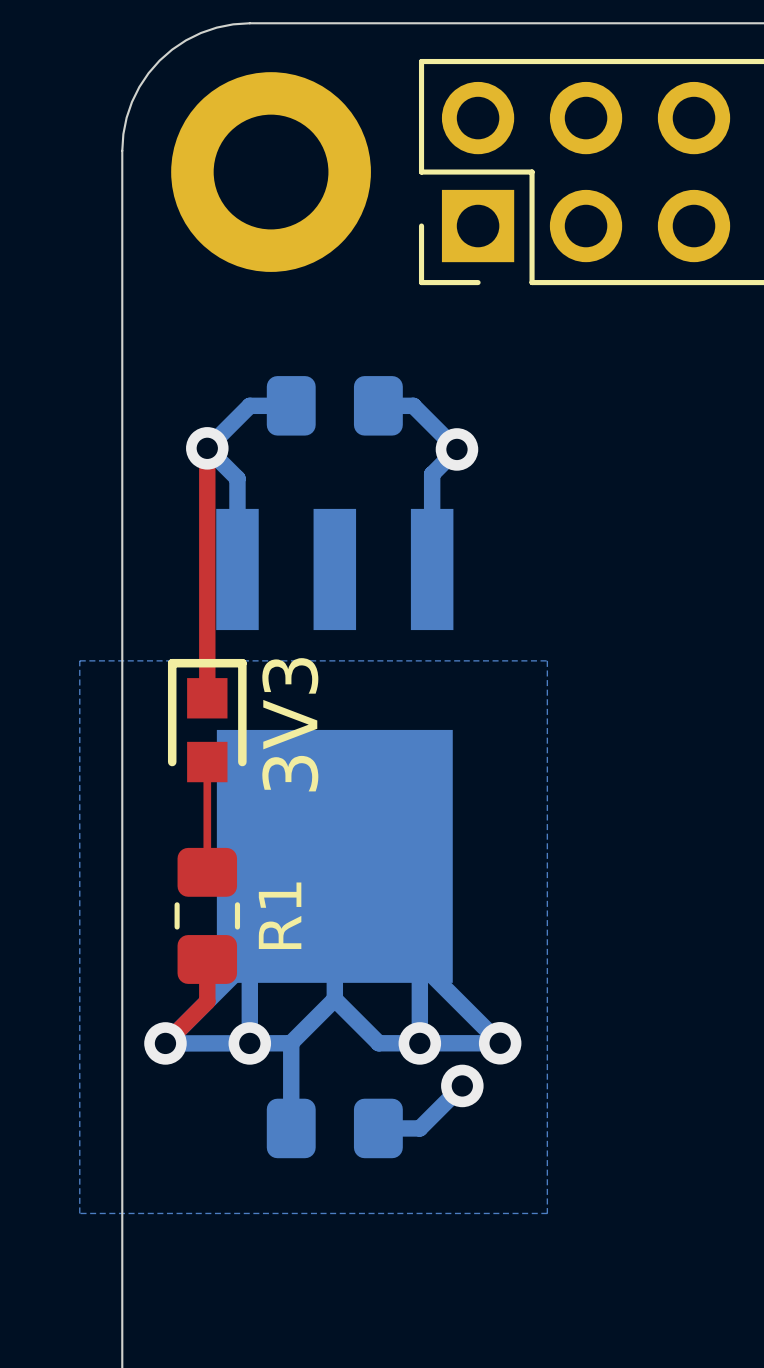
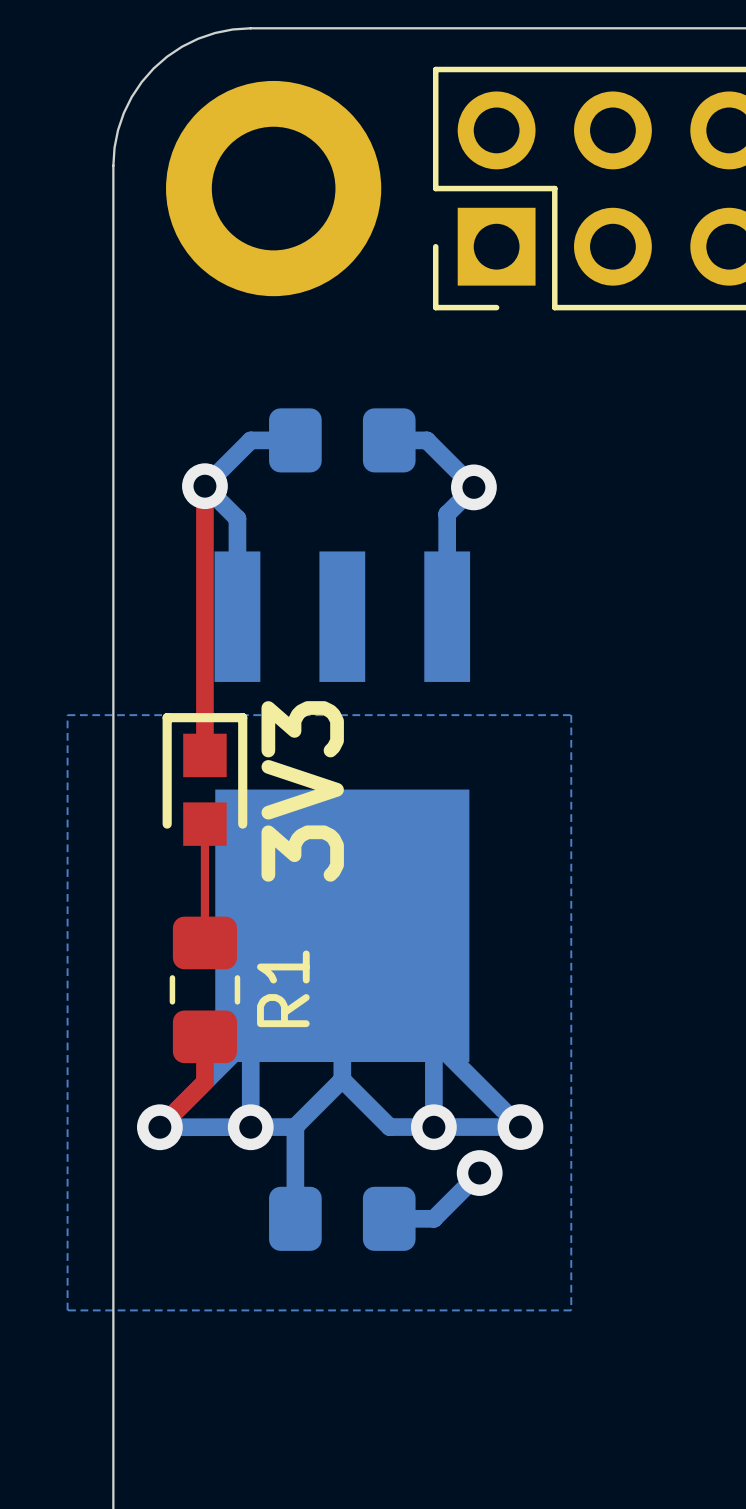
3V3 name: 3V3 (290, 724) -> none
text: none -> 3V3 (302, 791)

